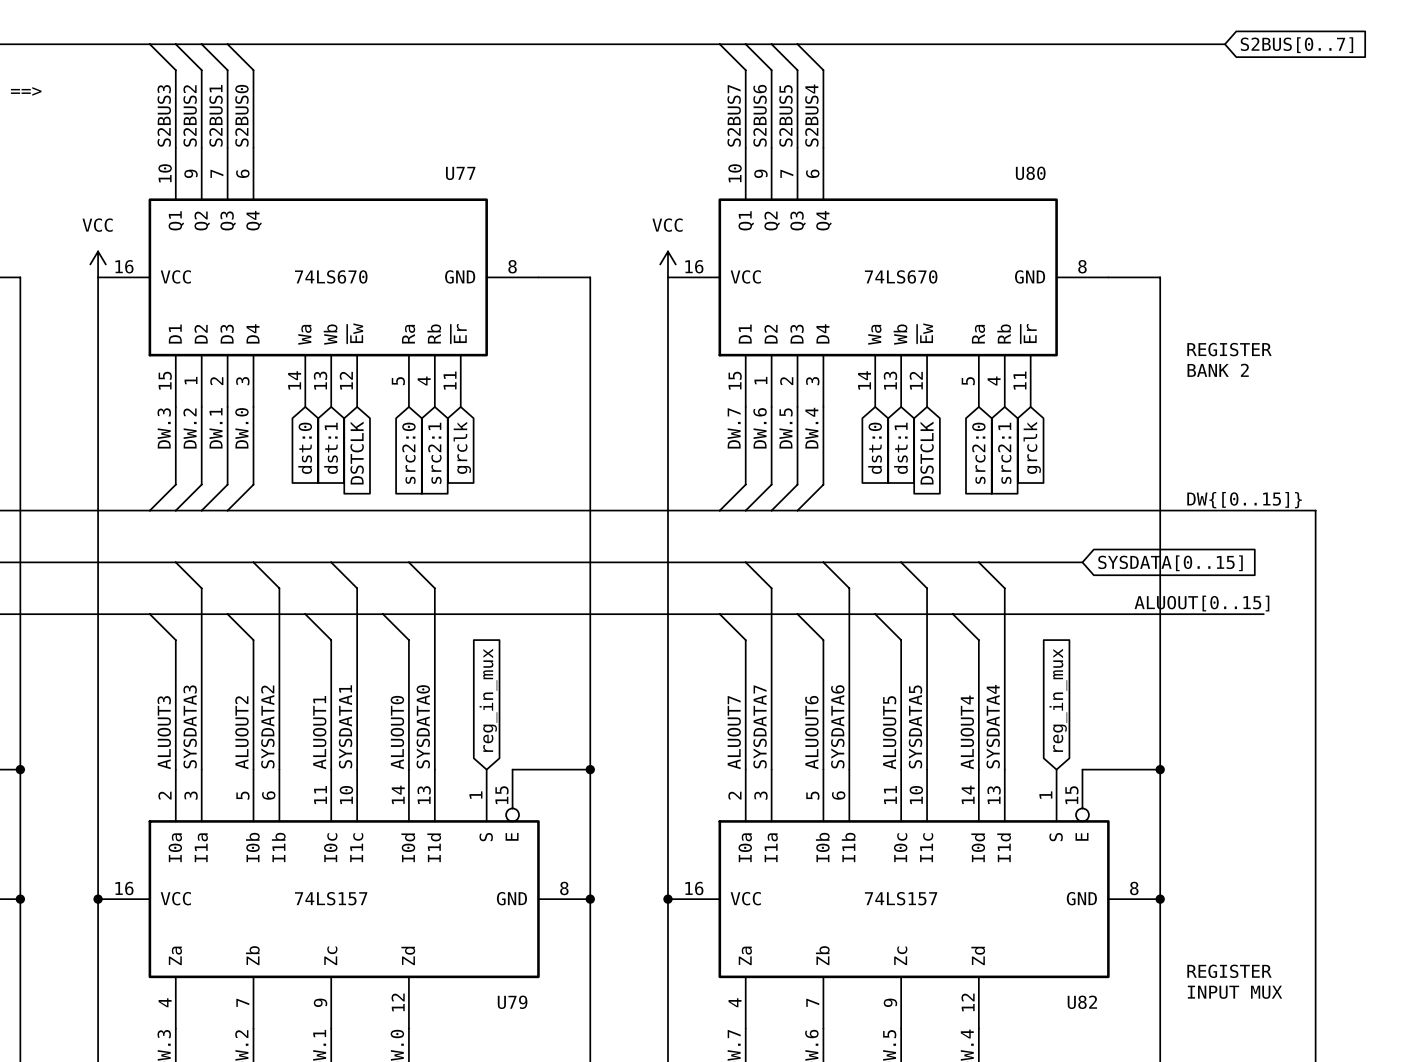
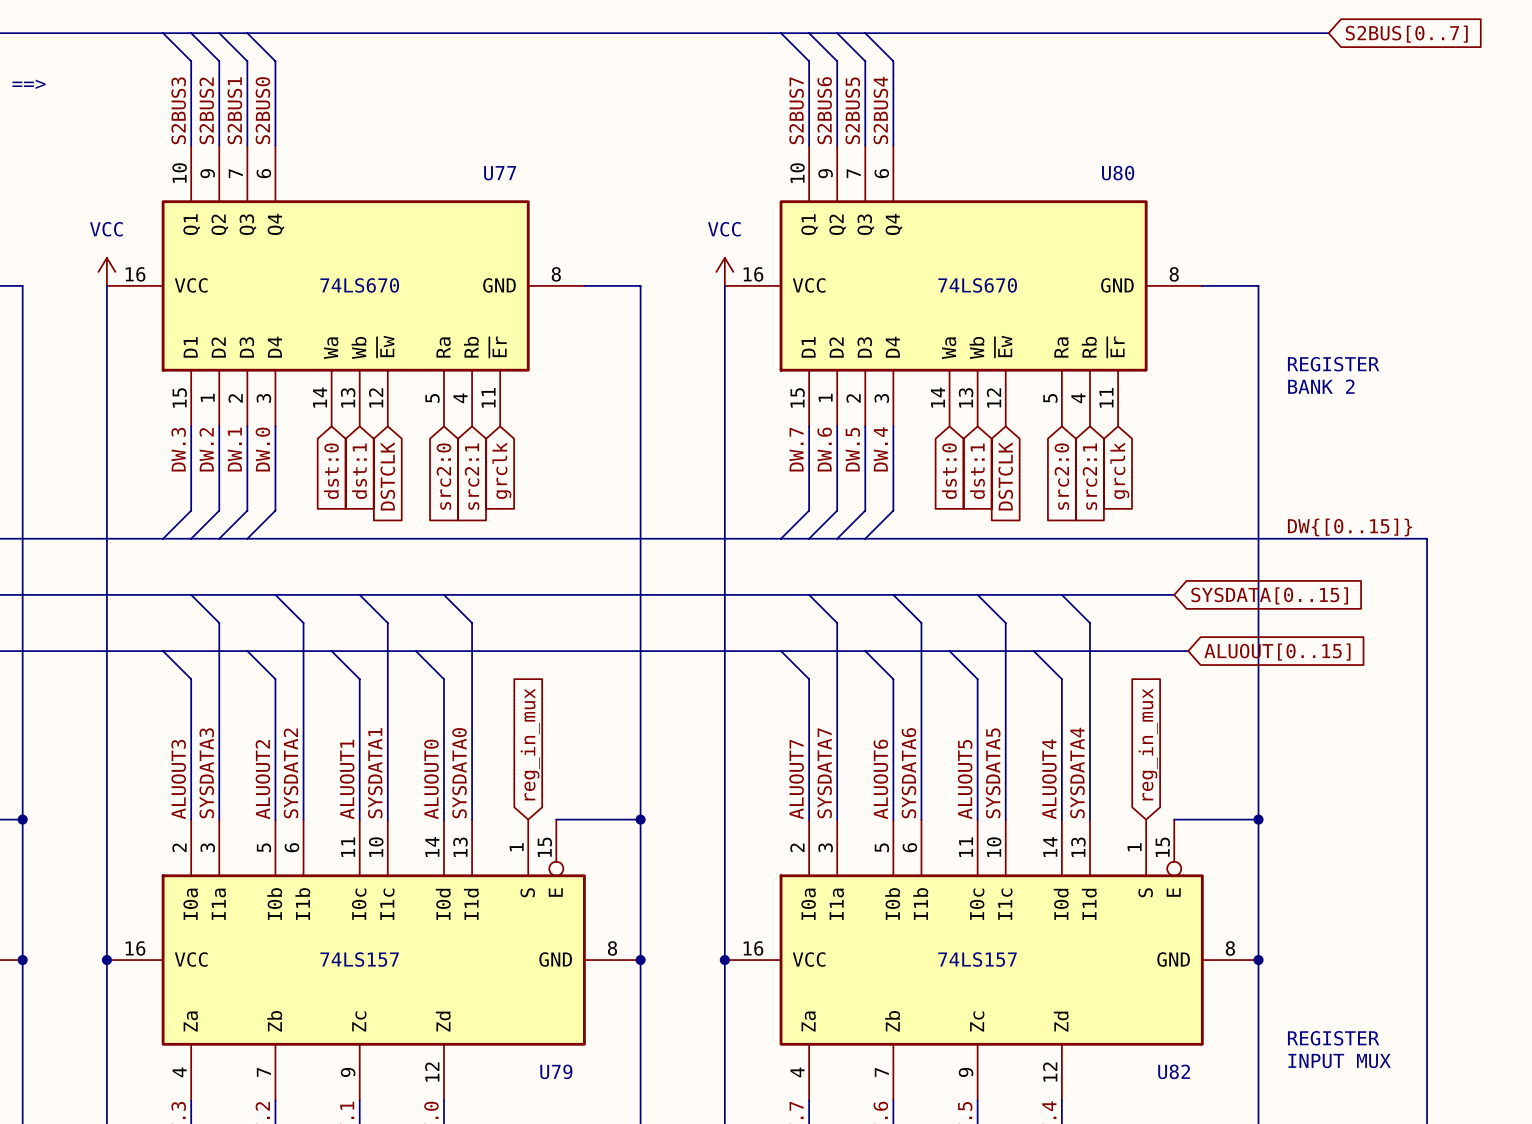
label: ALUOUT[0..15] (1201, 603) -> none
bus: (1095, 614) (1263, 614) -> none
global label: none -> ALUOUT[0..15] (1277, 652)

